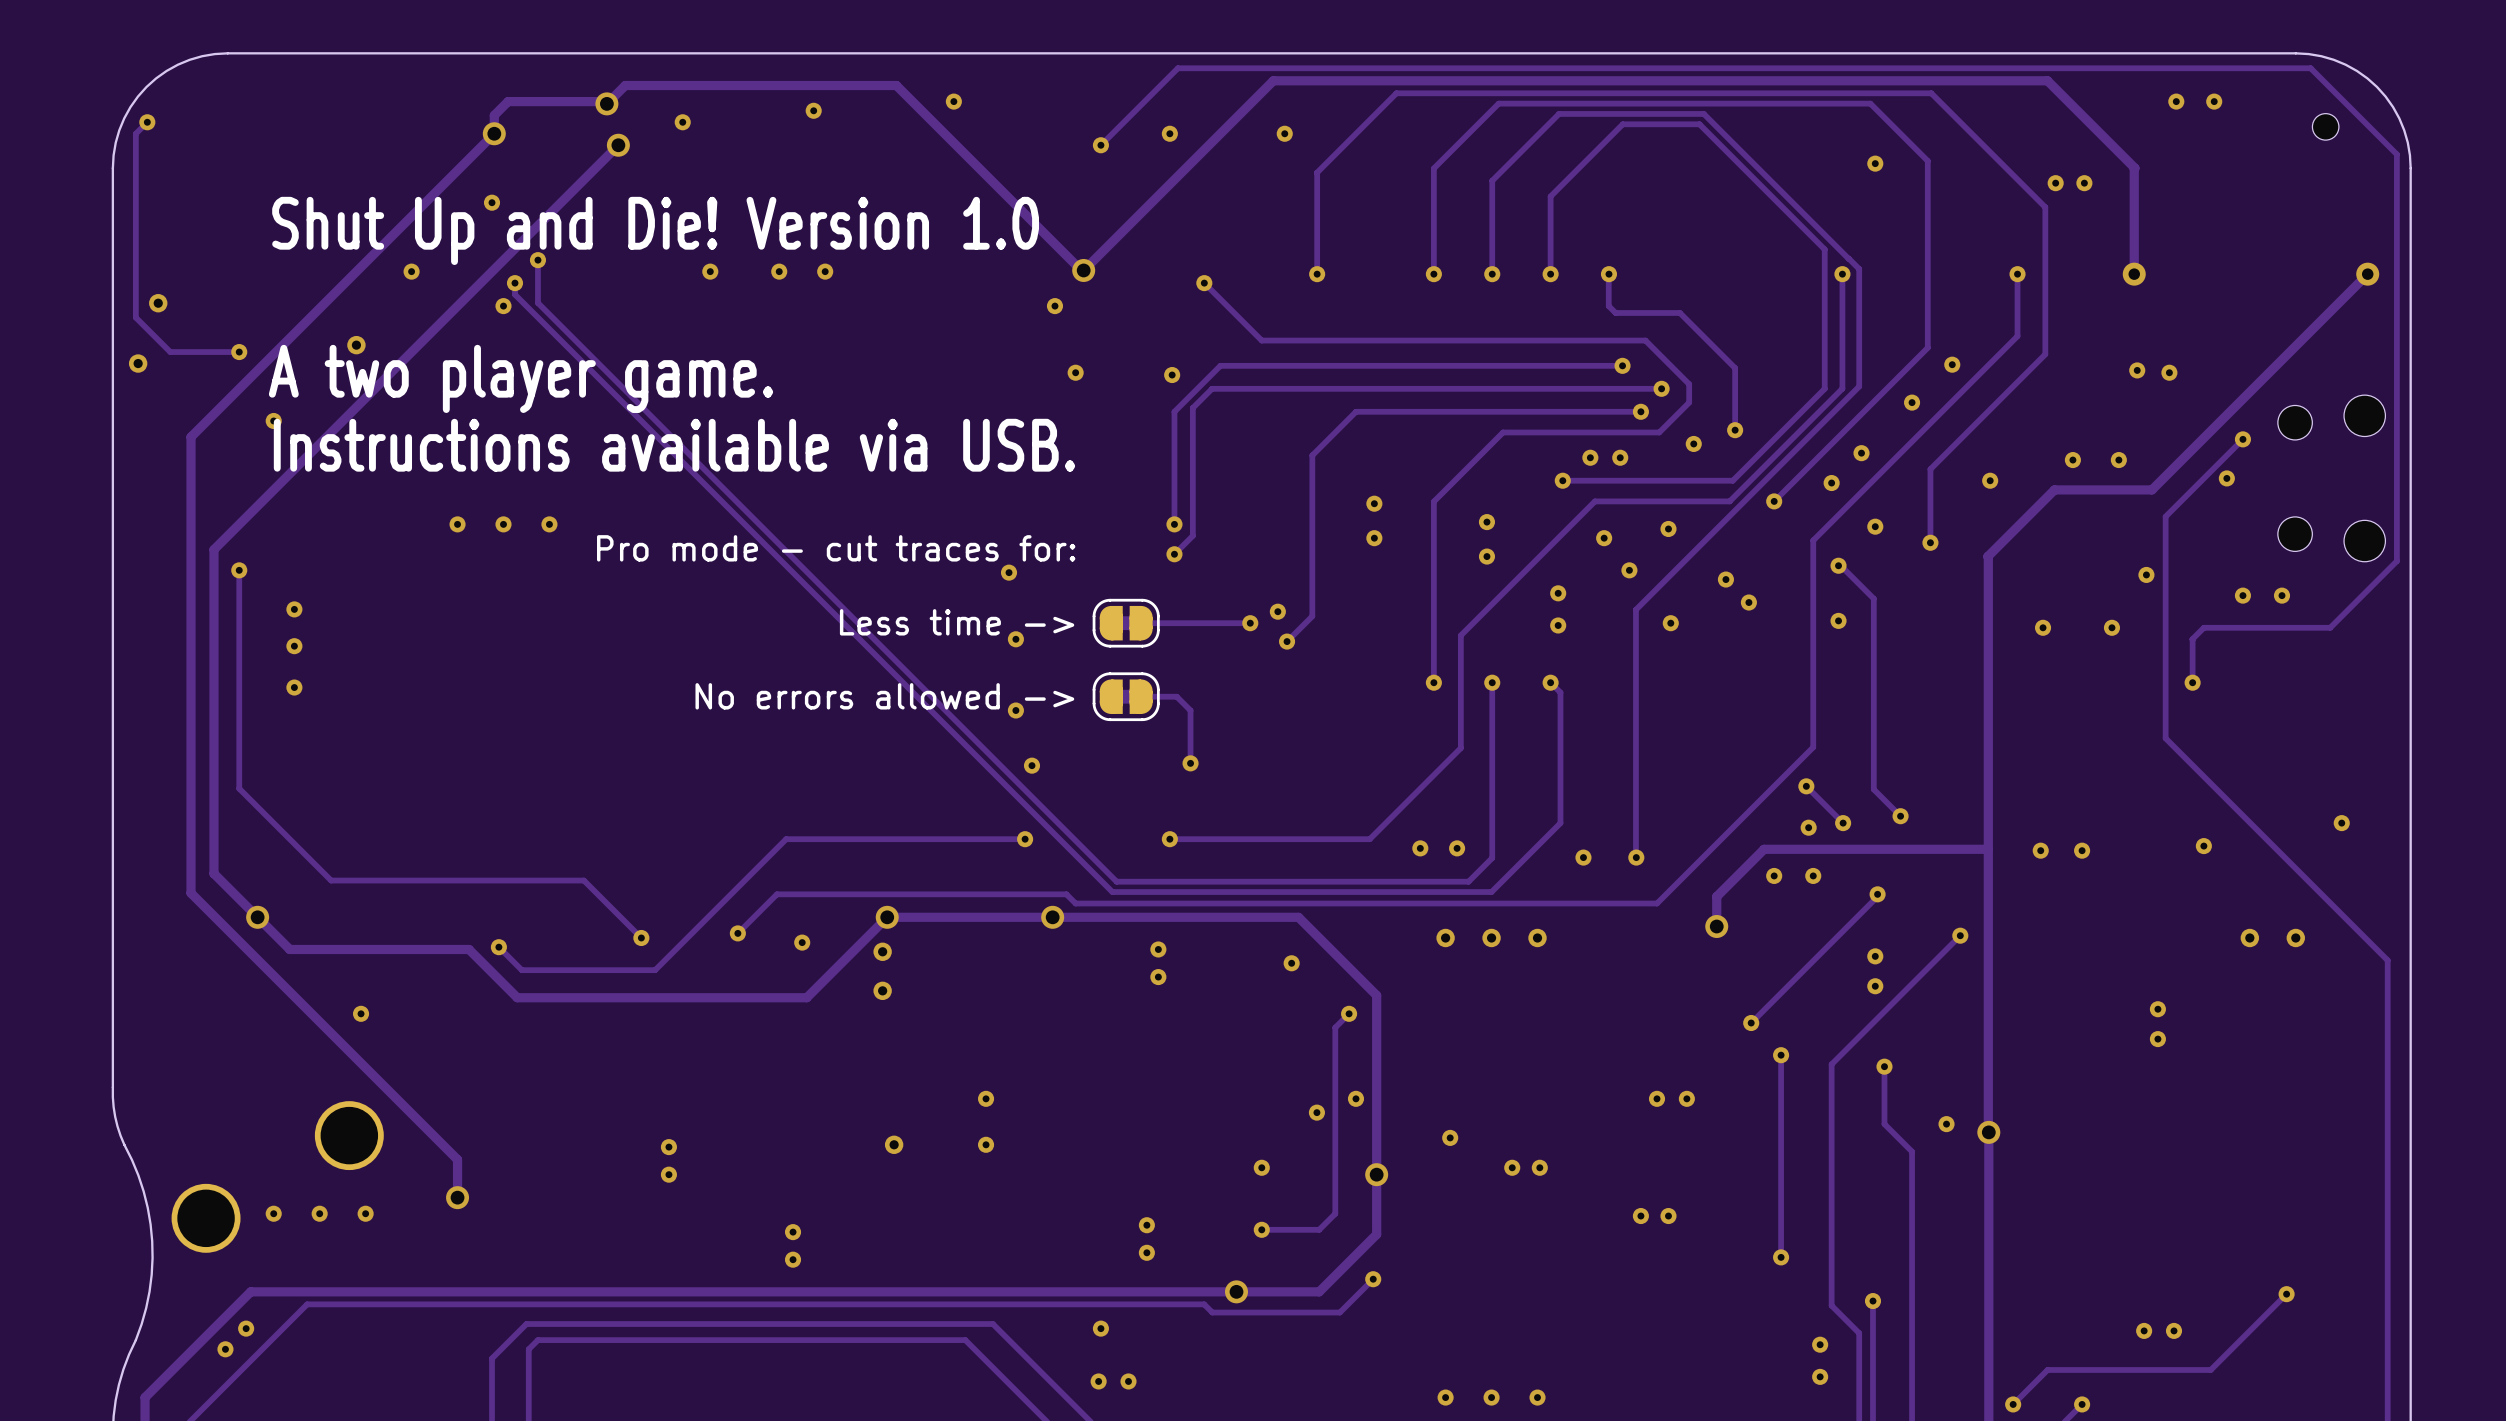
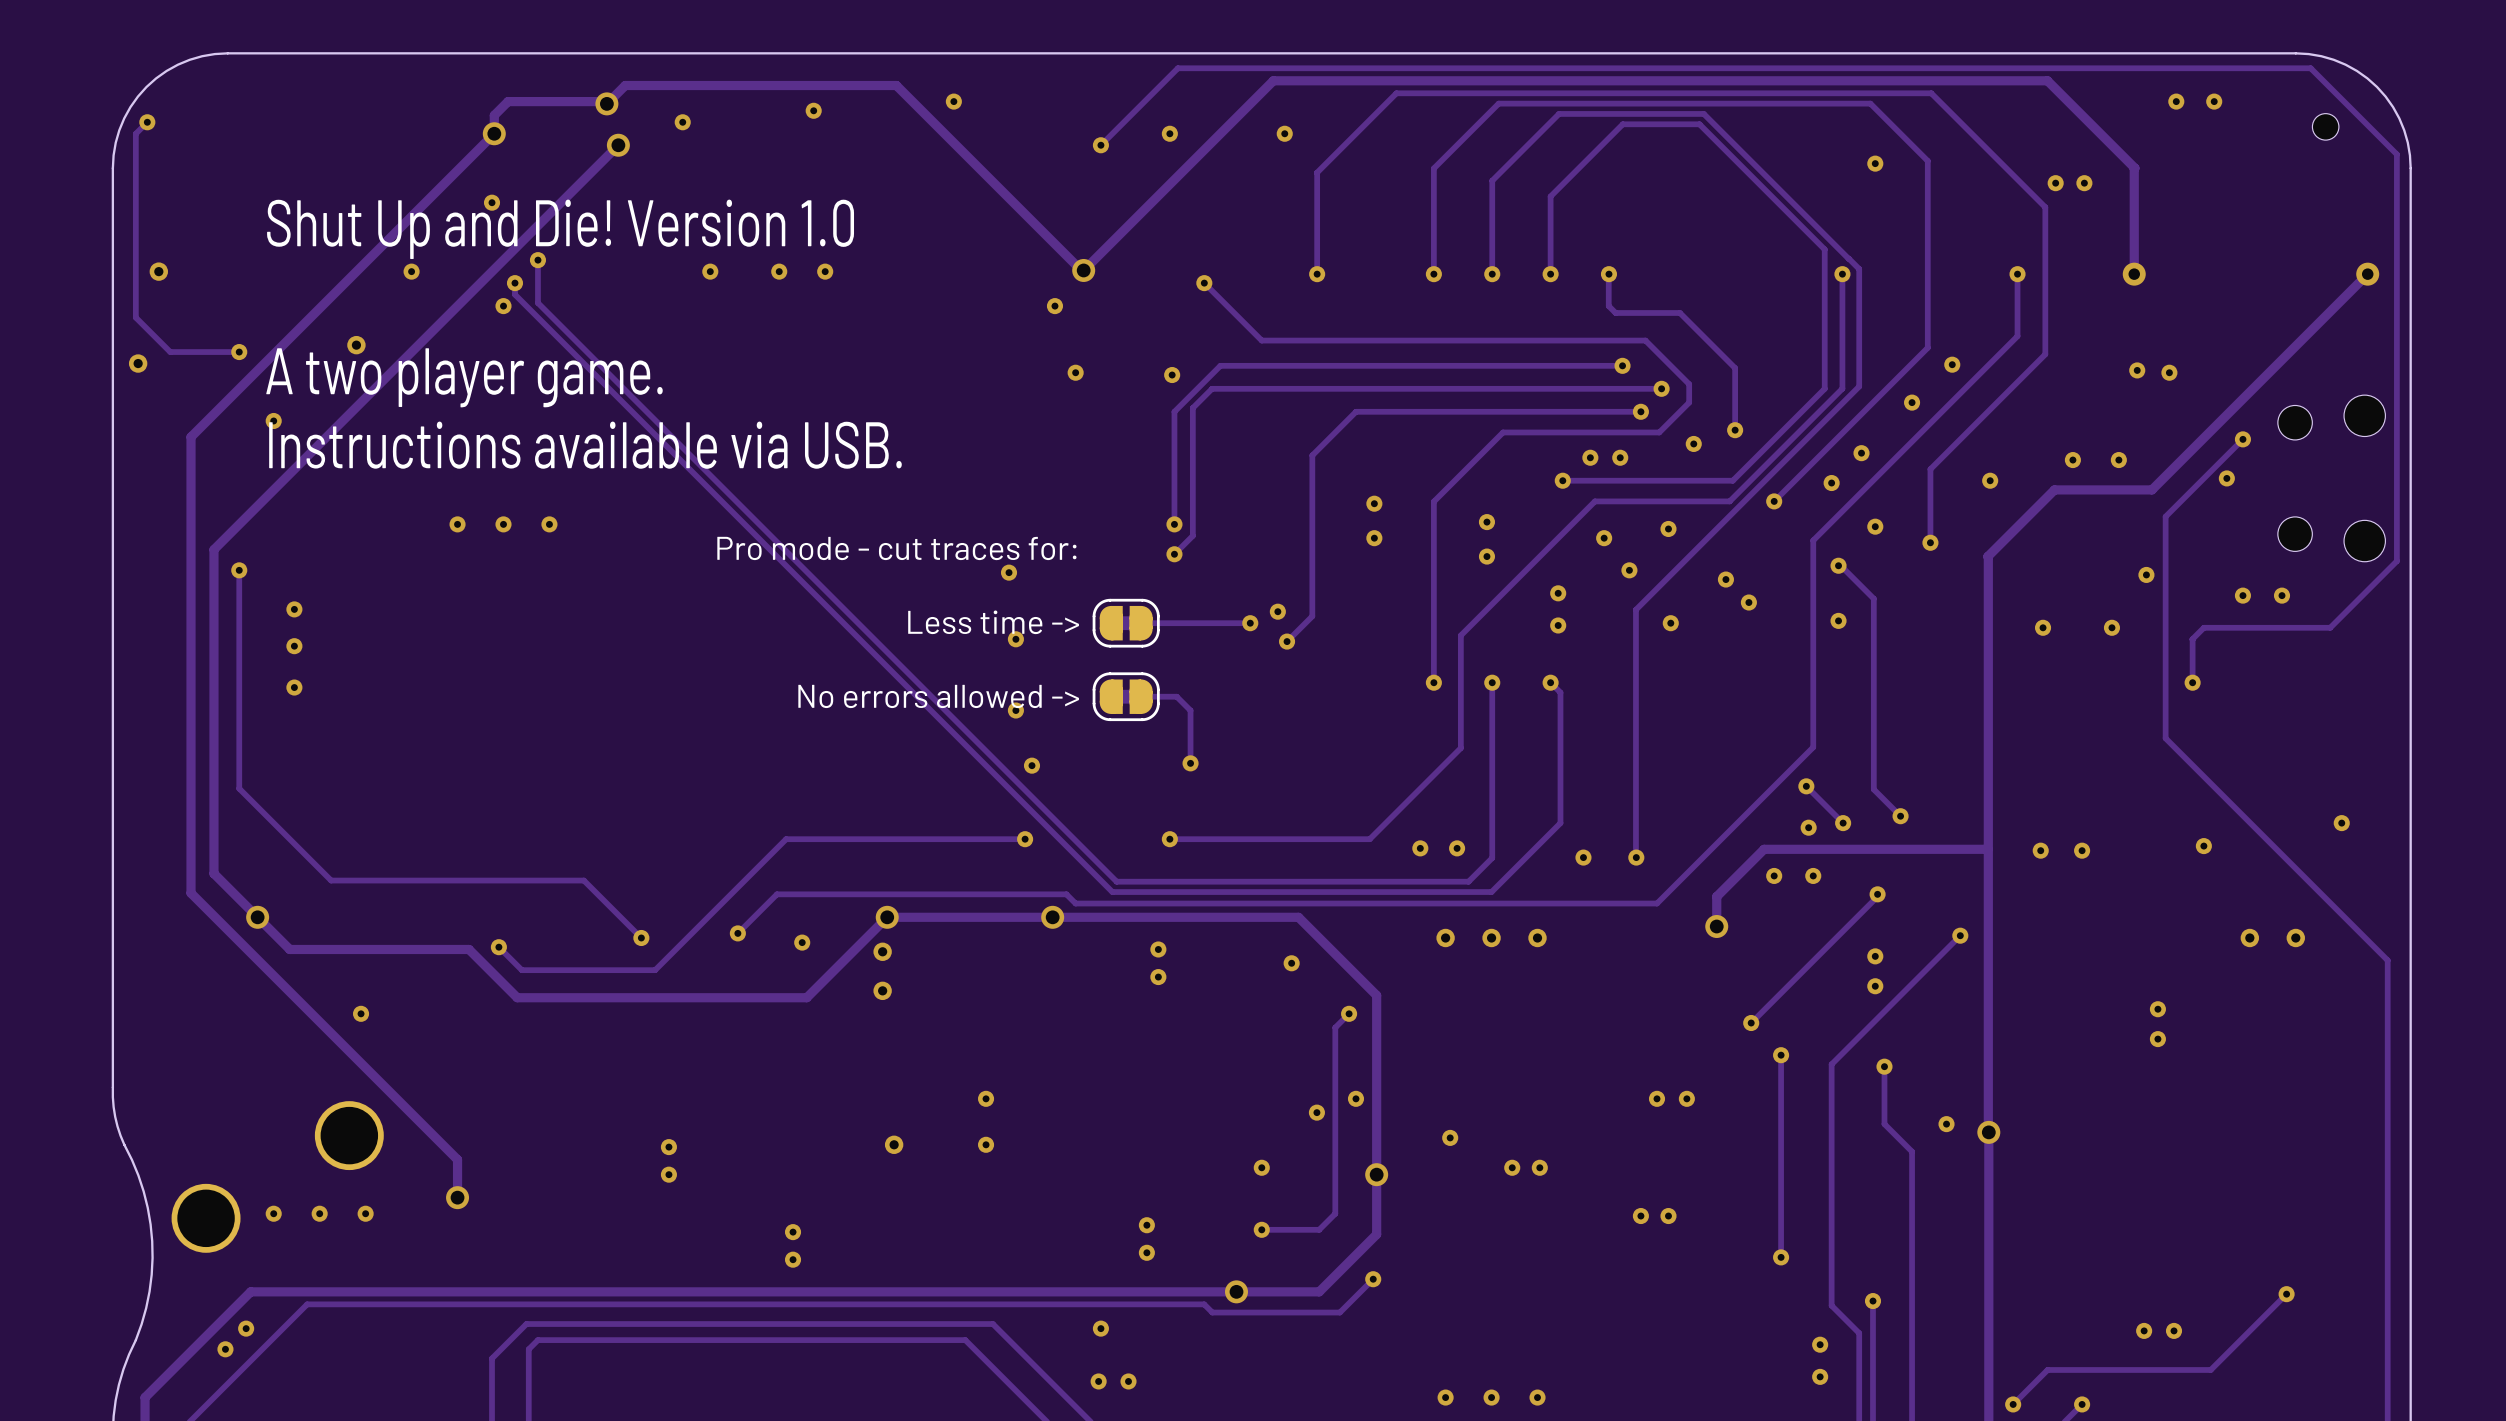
via position: (158, 303) -> (158, 271)

